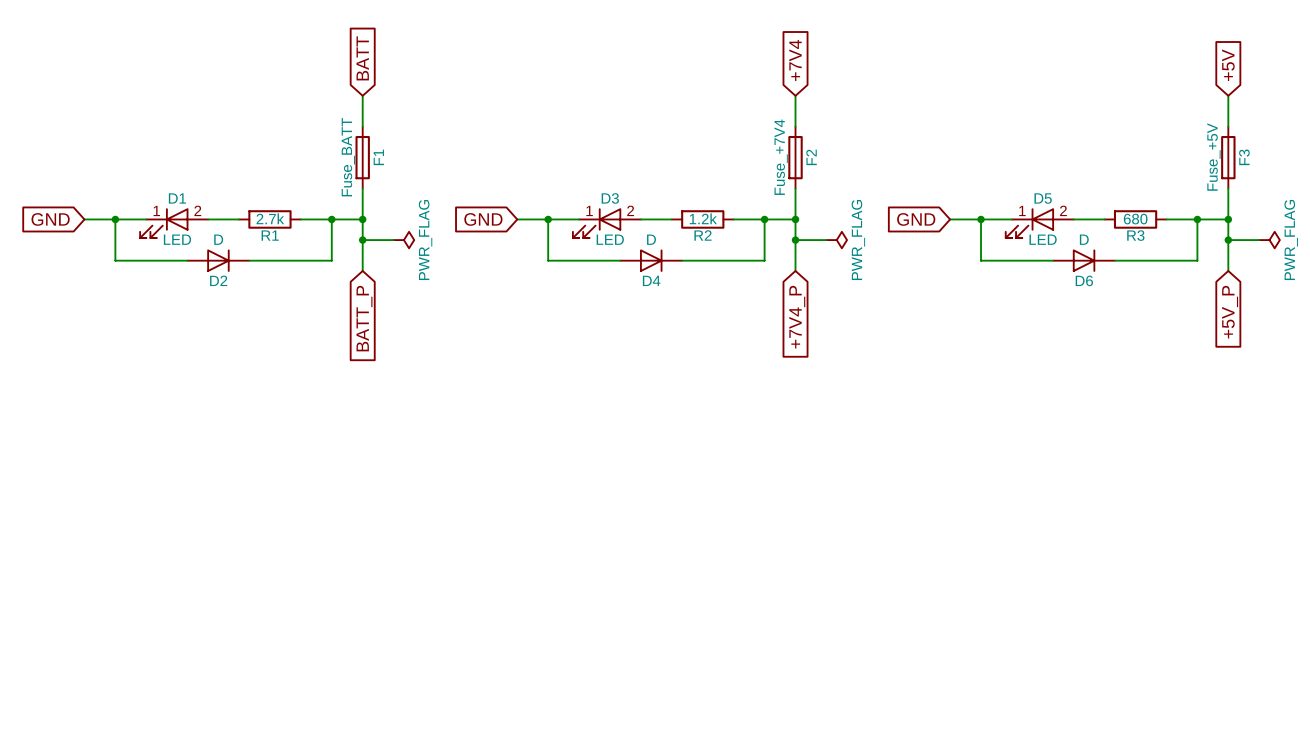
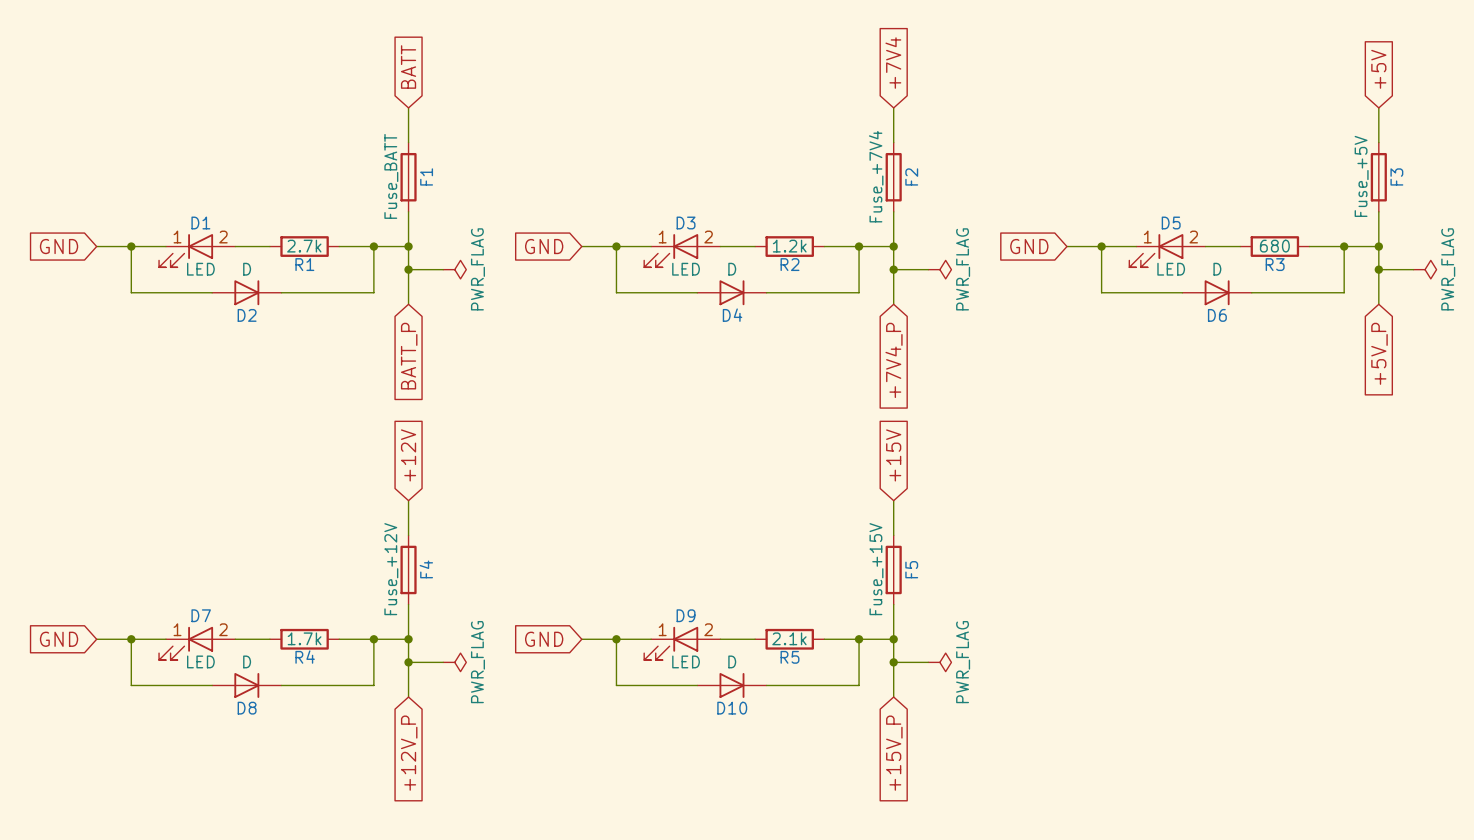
global label: none -> +12V (408, 455)
global label: none -> +15V (893, 455)
wire: none -> (408, 500) (408, 535)
wire: none -> (893, 500) (893, 535)
F4: none -> Fuse_+12V (408, 569)
F5: none -> Fuse_+15V (893, 569)
wire: none -> (408, 604) (408, 697)
wire: none -> (893, 604) (893, 697)
global label: none -> GND (59, 639)
wire: none -> (96, 639) (165, 639)
wire: none -> (131, 639) (131, 685) (212, 685)
junction: none -> (131, 639)
wire: none -> (235, 639) (269, 639)
R4: none -> 1.7k (304, 639)
wire: none -> (339, 639) (408, 639)
wire: none -> (373, 639) (373, 685) (281, 685)
junction: none -> (373, 639)
junction: none -> (408, 639)
global label: none -> GND (544, 639)
wire: none -> (581, 639) (651, 639)
wire: none -> (616, 639) (616, 685) (697, 685)
junction: none -> (616, 639)
wire: none -> (720, 639) (755, 639)
R5: none -> 2.1k (789, 639)
wire: none -> (824, 639) (893, 639)
wire: none -> (859, 639) (859, 685) (766, 685)
junction: none -> (859, 639)
junction: none -> (893, 639)
D7: none -> LED (197, 643)
D9: none -> LED (682, 643)
wire: none -> (408, 662) (443, 662)
junction: none -> (408, 662)
power symbol: none -> PWR_FLAG (454, 662)
wire: none -> (893, 662) (928, 662)
junction: none -> (893, 662)
power symbol: none -> PWR_FLAG (939, 662)
D8: none -> D (246, 685)
D10: none -> D (731, 685)
global label: none -> +12V_P (409, 753)
global label: none -> +15V_P (894, 753)

